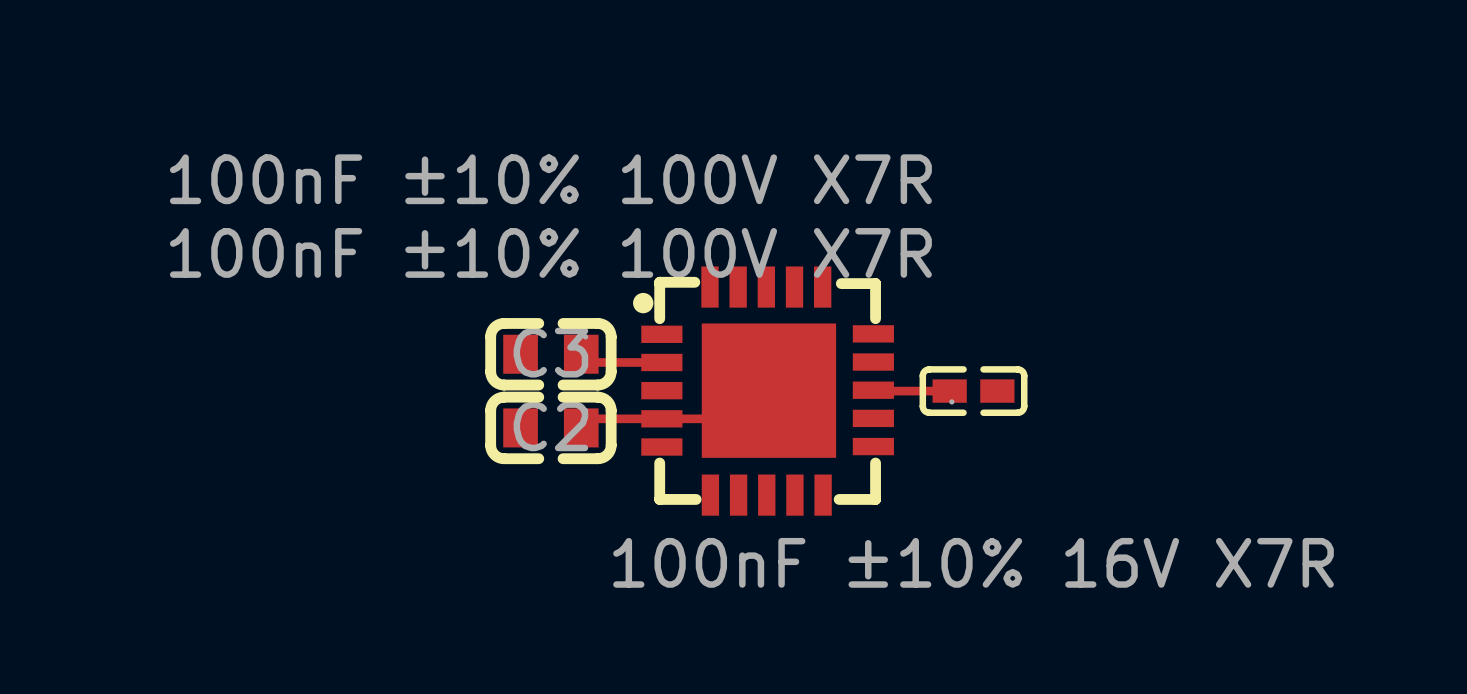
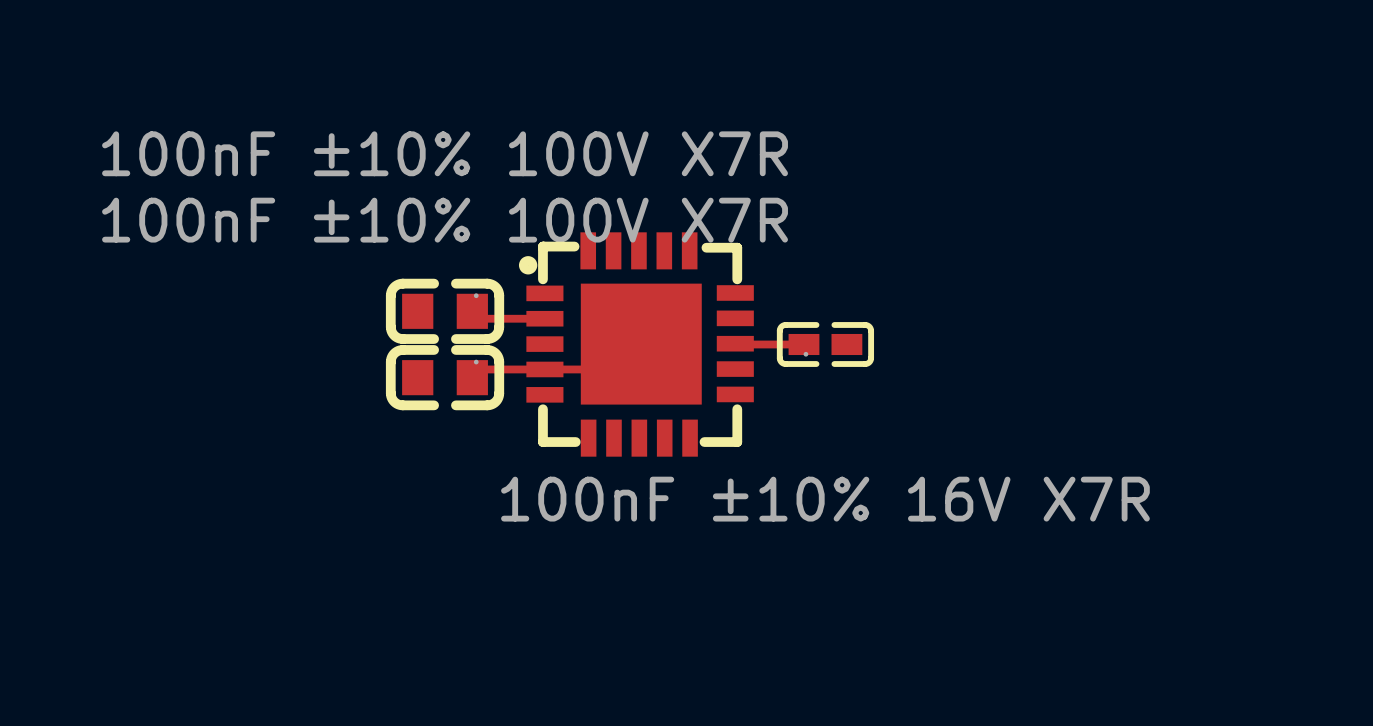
C3 name: C3 (550, 352) -> none
C2 name: C2 (550, 426) -> none

